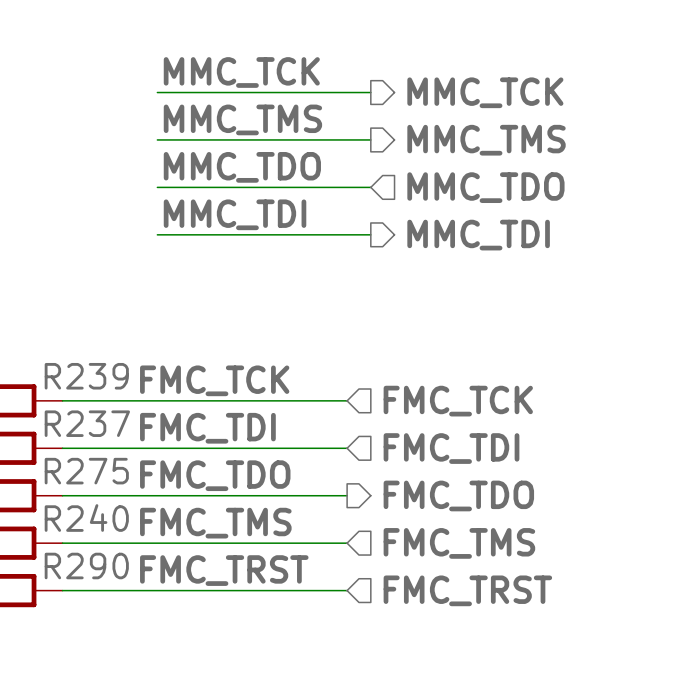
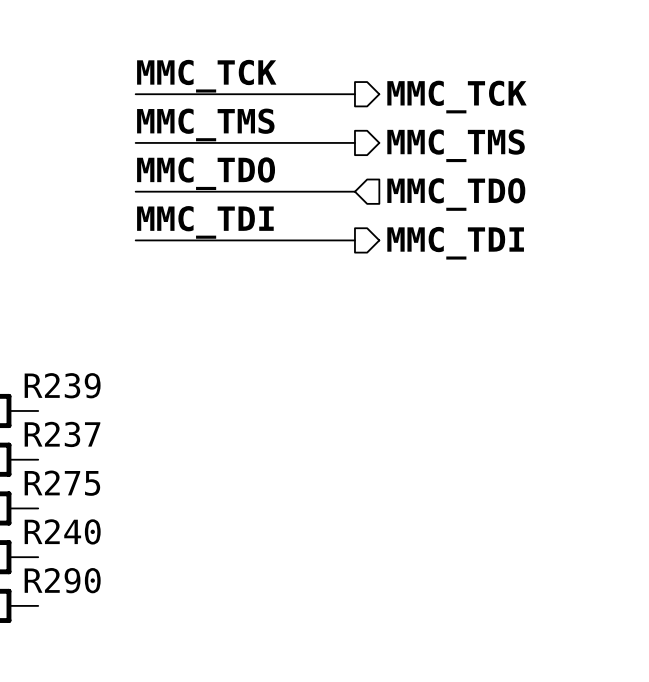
label: FMC_TCK (214, 380) -> none
wire: (62, 400) (347, 400) -> none
hierarchical label: FMC_TCK (458, 401) -> none
label: FMC_TDI (207, 428) -> none
wire: (62, 448) (347, 448) -> none
hierarchical label: FMC_TDI (451, 448) -> none
label: FMC_TDO (215, 475) -> none
wire: (62, 495) (347, 495) -> none
hierarchical label: FMC_TDO (458, 495) -> none
label: FMC_TMS (215, 523) -> none
wire: (62, 543) (347, 543) -> none
hierarchical label: FMC_TMS (459, 543) -> none
label: FMC_TRST (224, 570) -> none
wire: (62, 590) (347, 590) -> none
hierarchical label: FMC_TRST (467, 590) -> none

